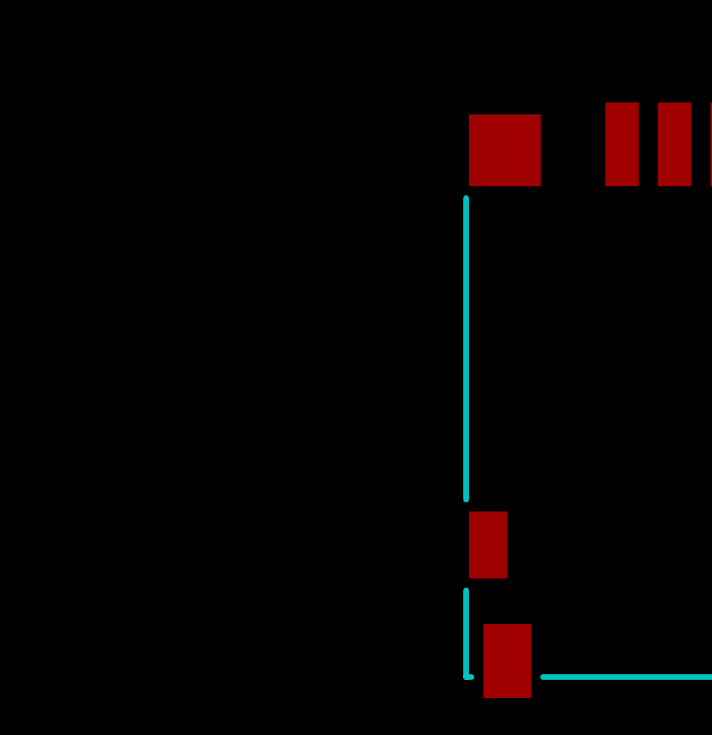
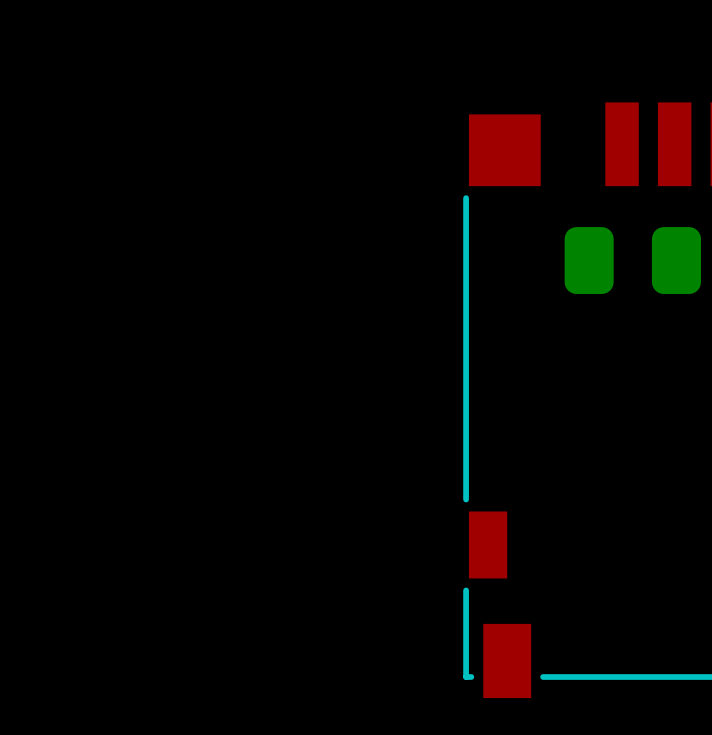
part: none -> (632, 260)

